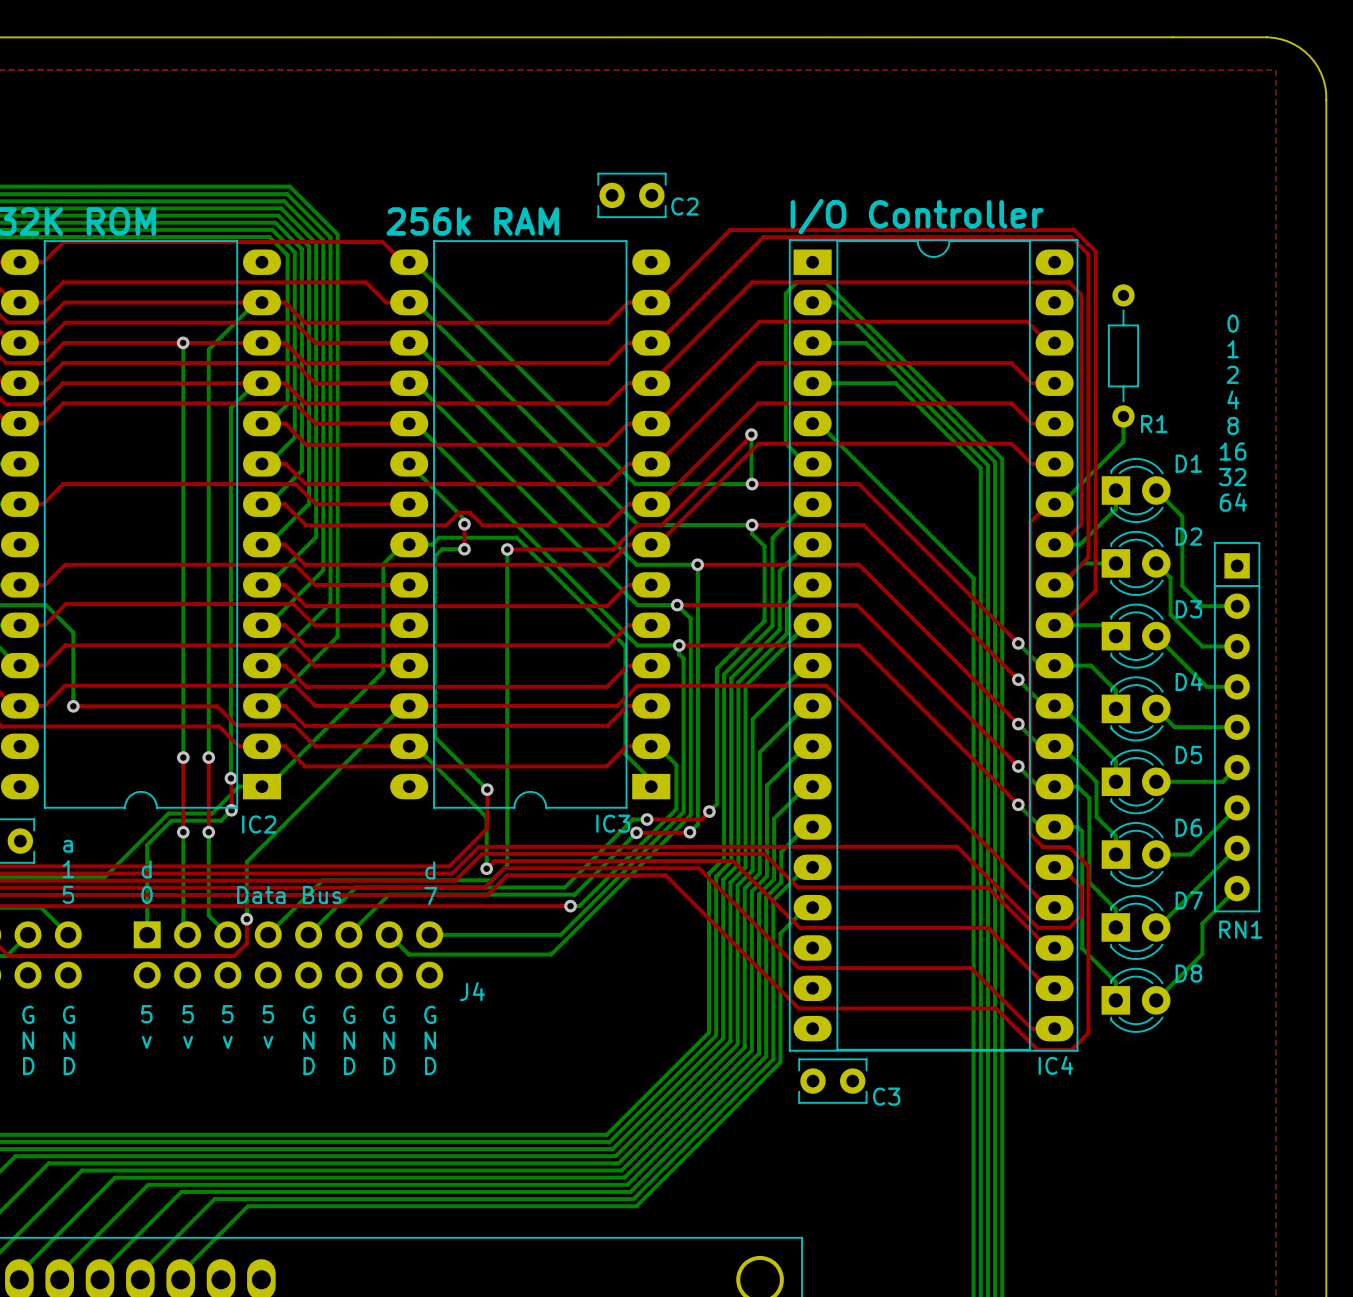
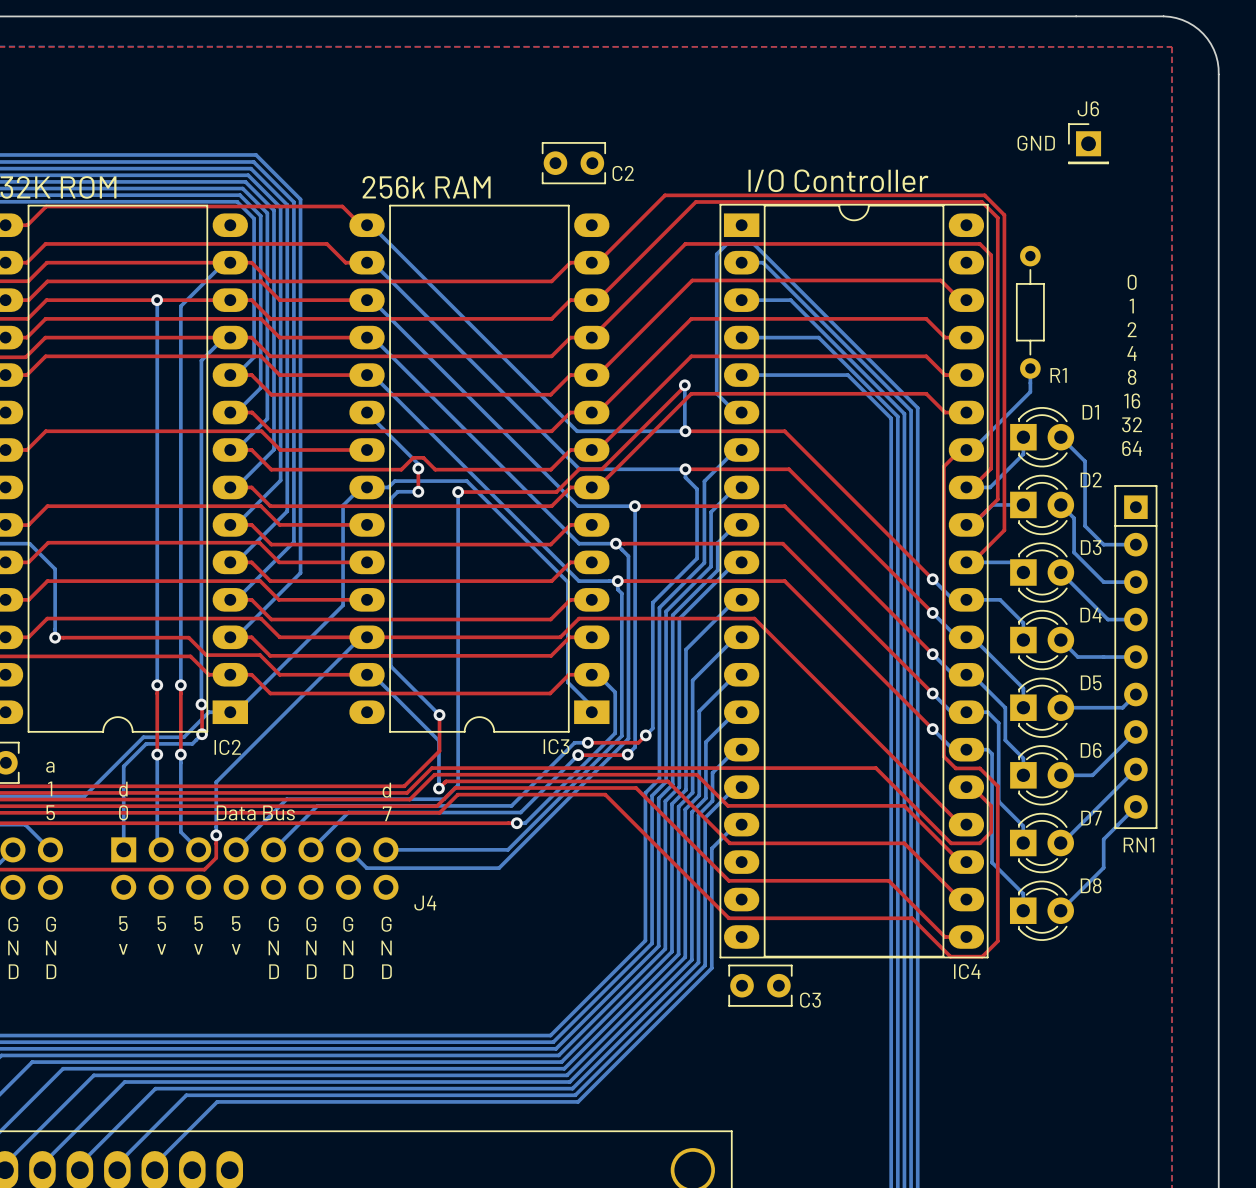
text: none -> GND (1036, 143)
J6: none -> (1088, 143)
bottom track: (818, 423) (973, 578) -> (747, 375) (847, 375) (891, 418) (891, 518)

